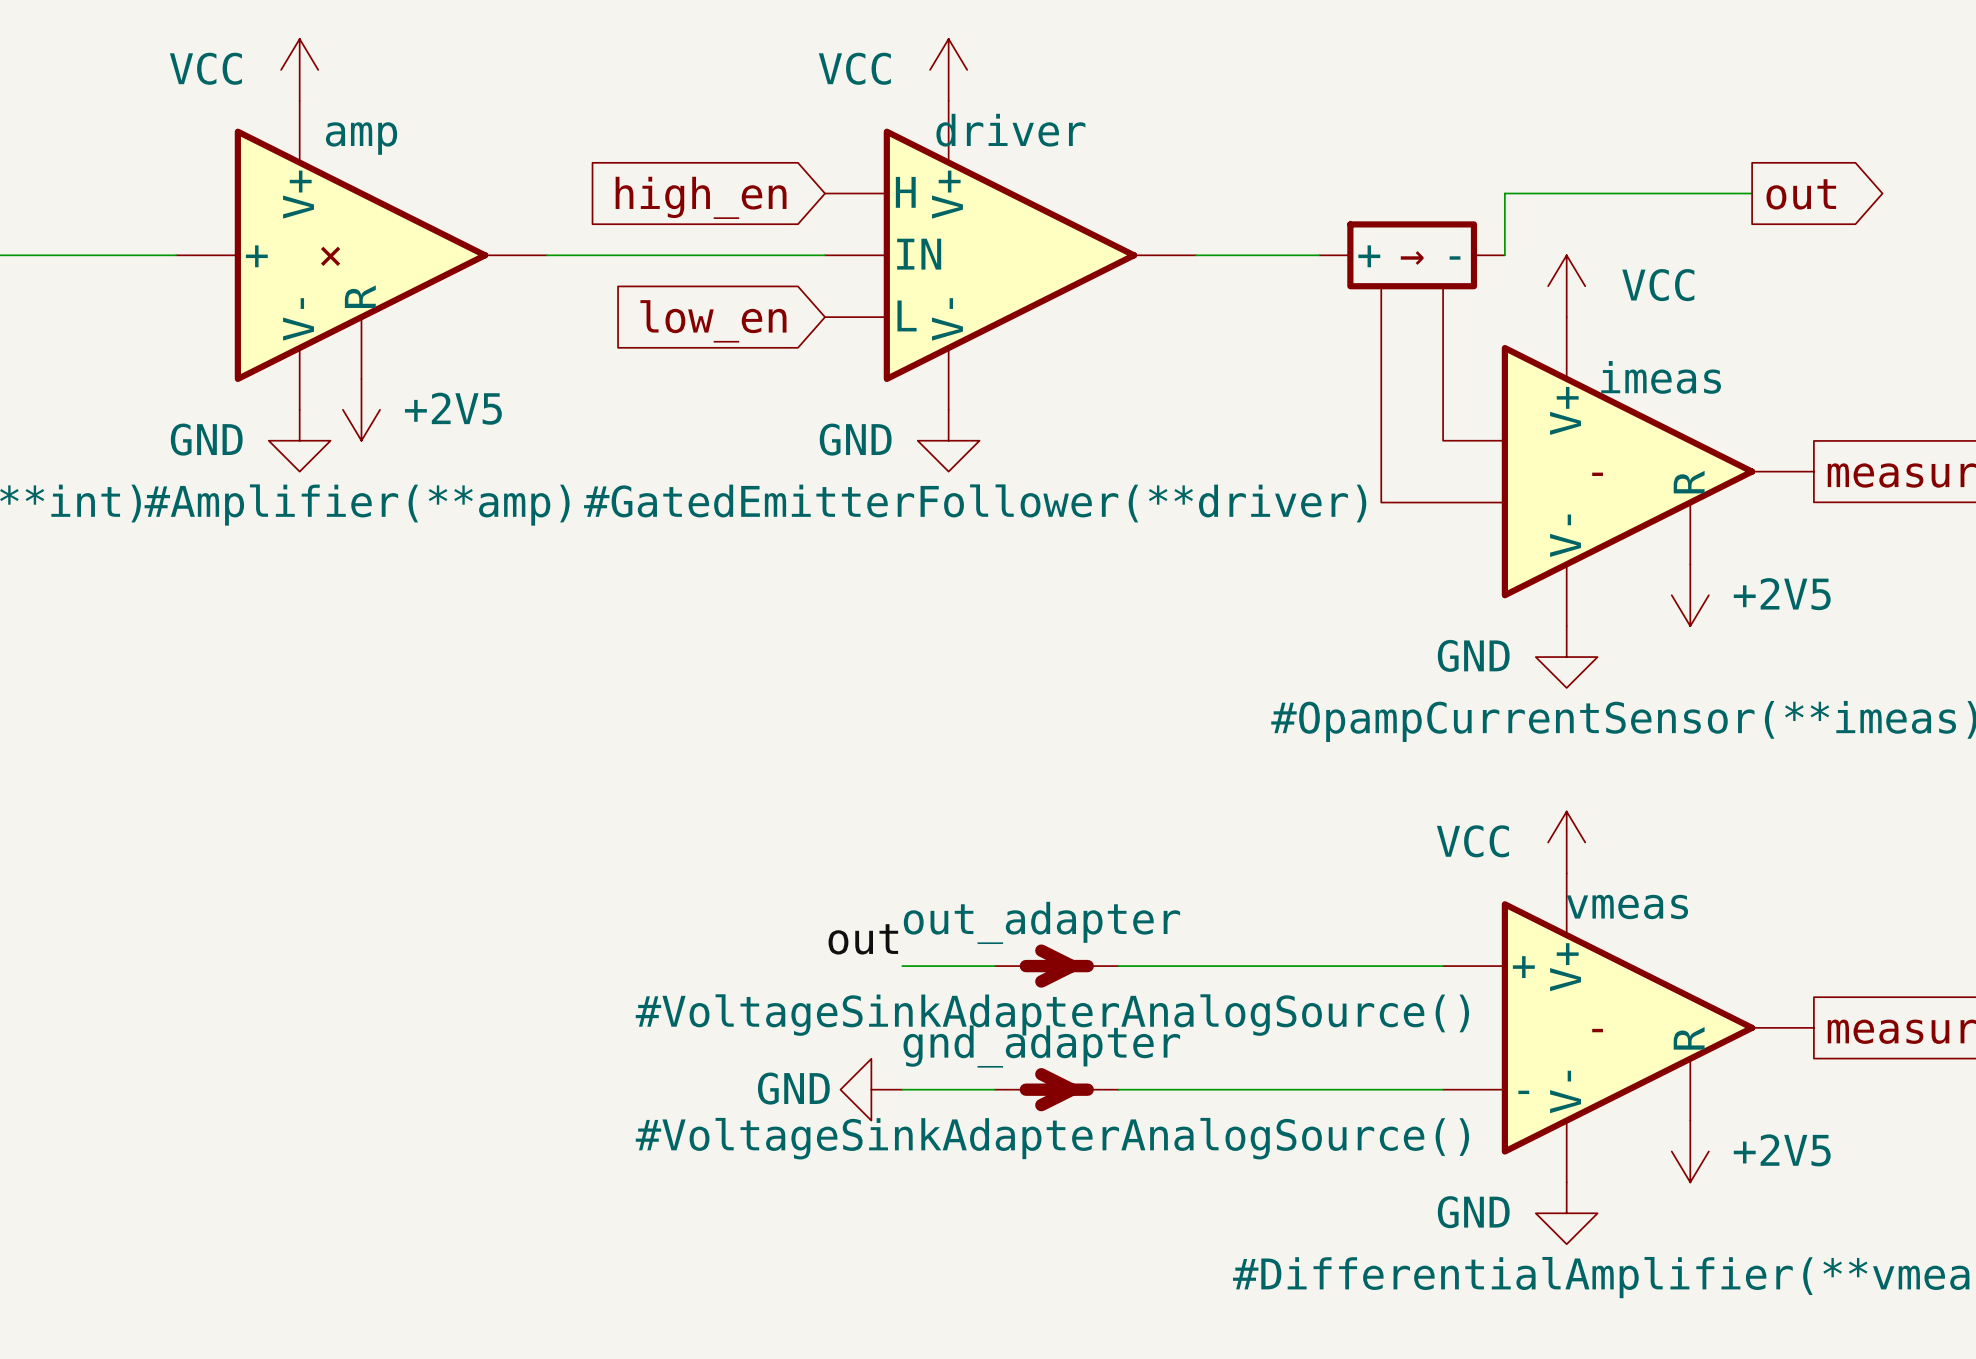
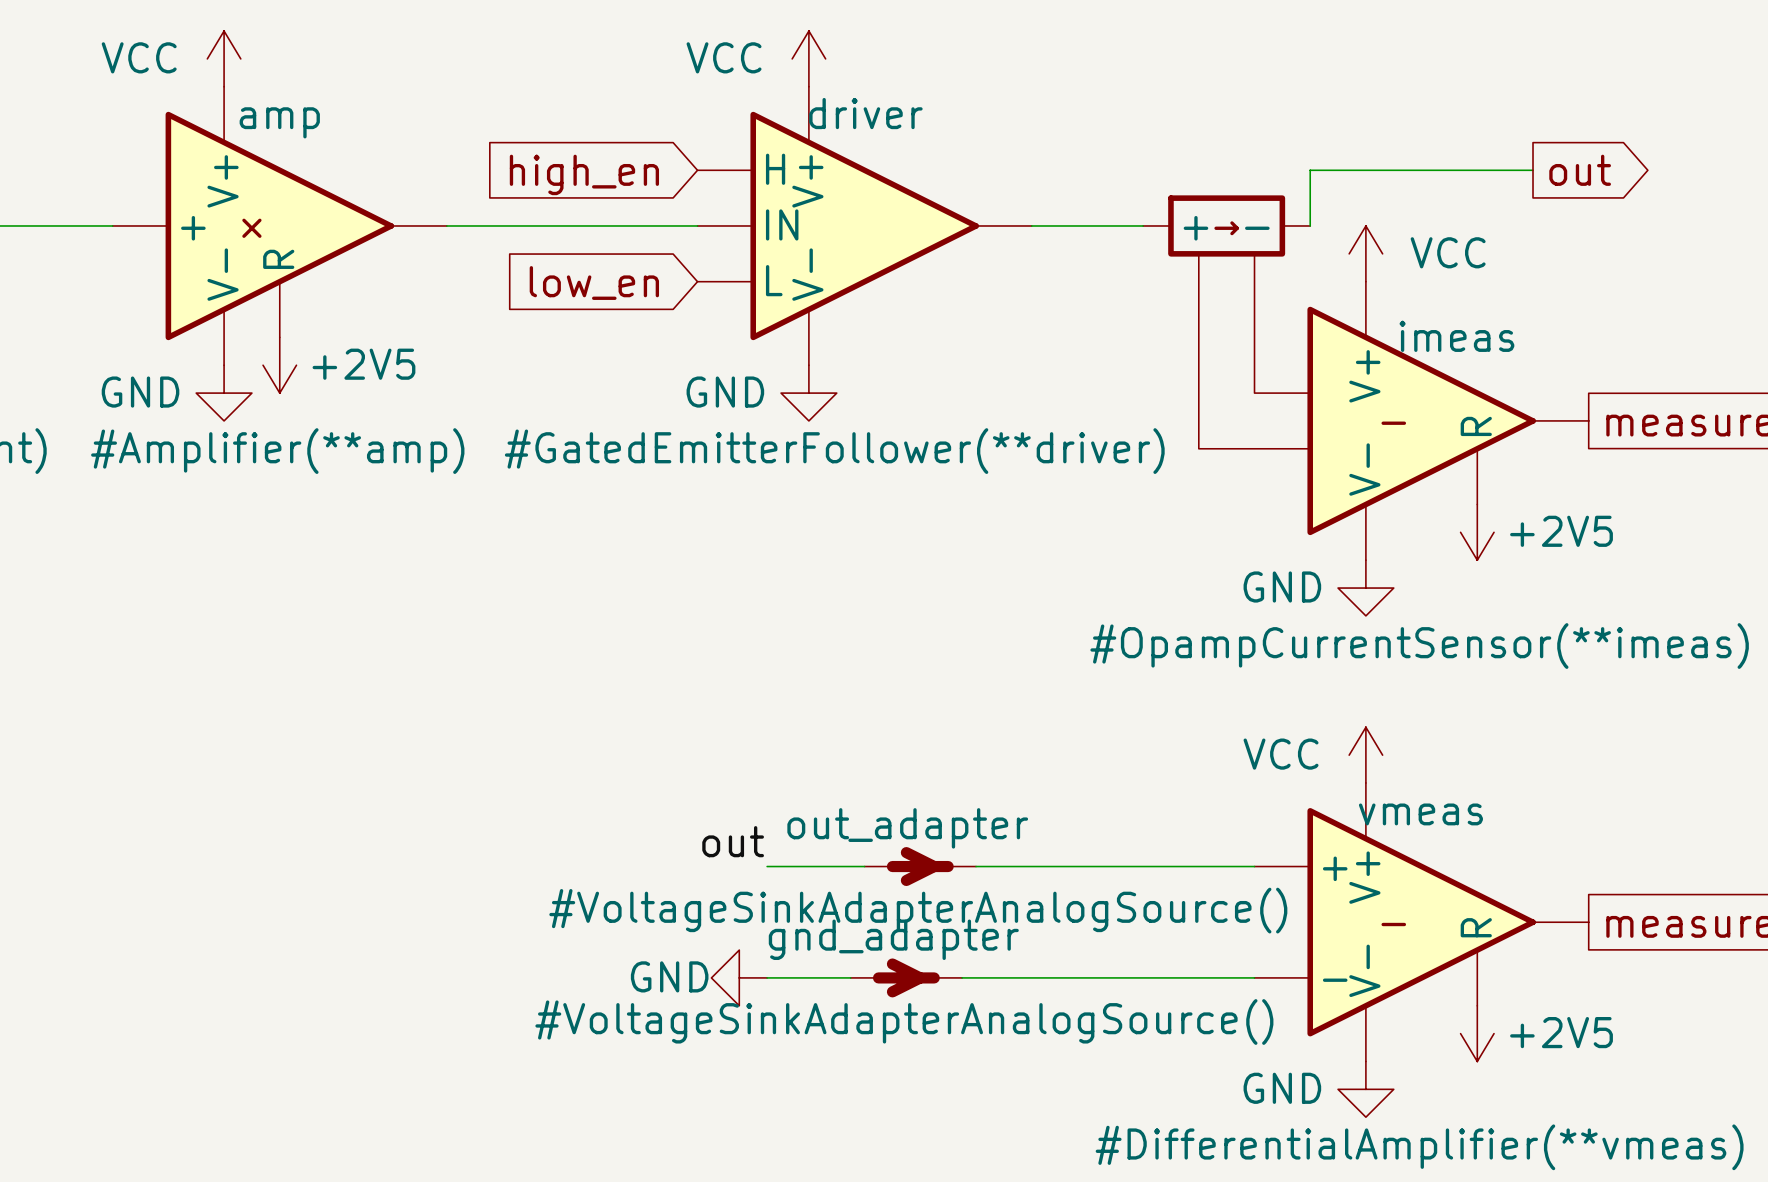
out_adapter position: (1056, 966) -> (920, 866)

